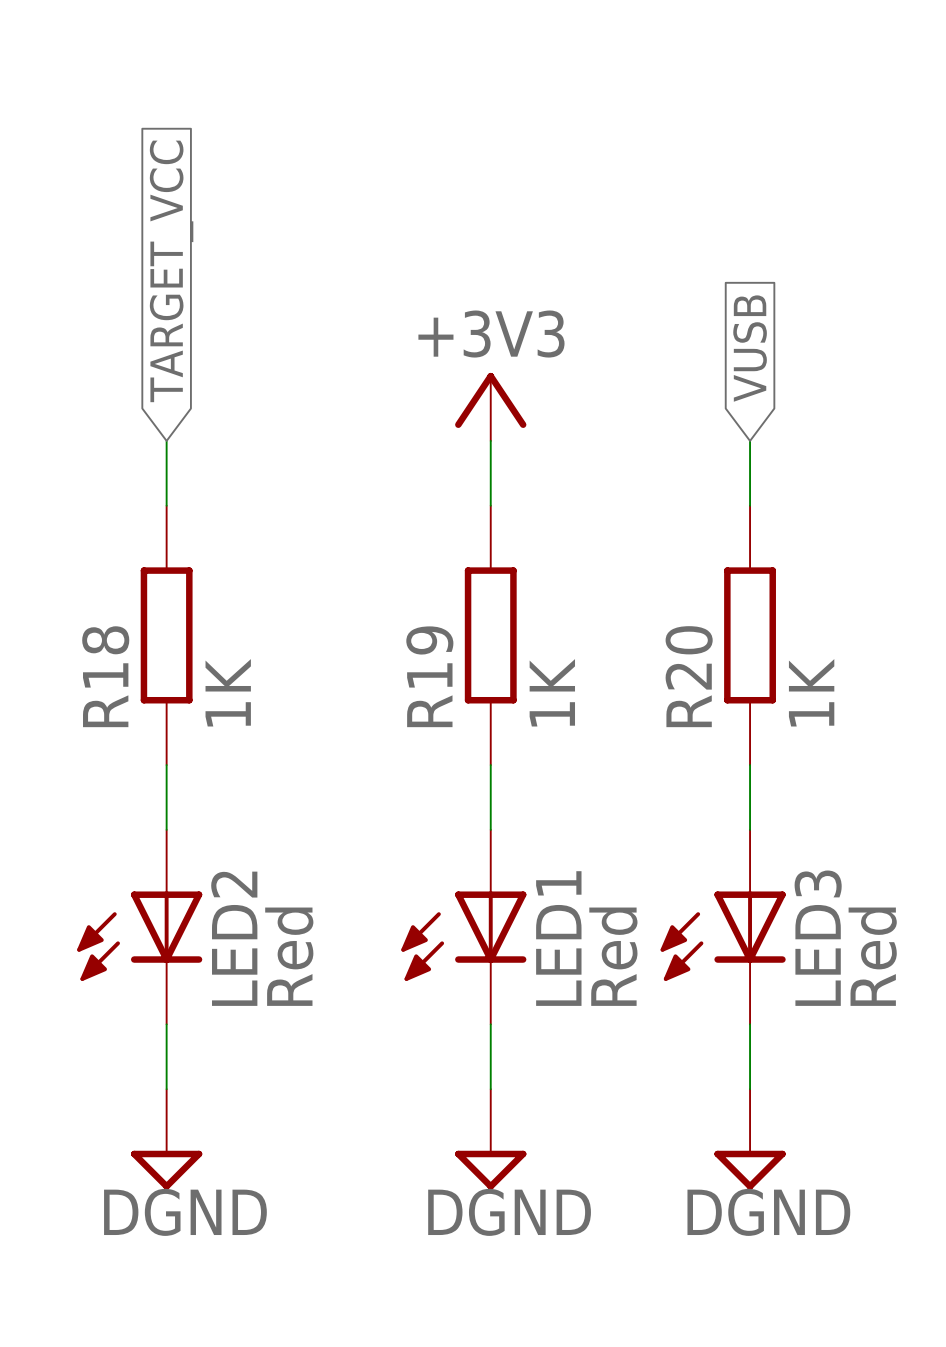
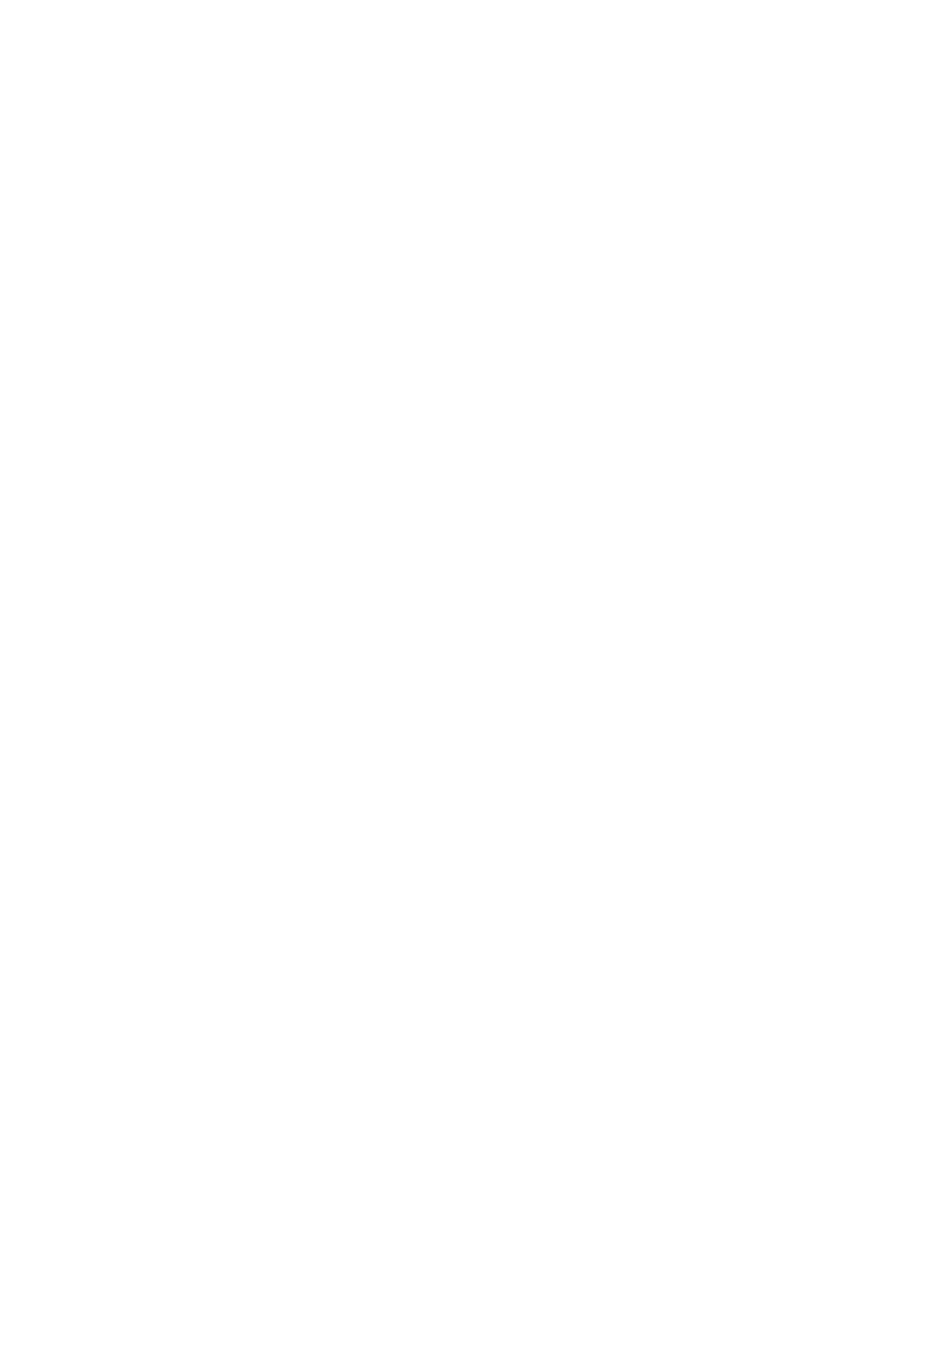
global label: TARGET_VCC (171, 271) -> none
global label: VUSB (750, 348) -> none
power symbol: +3V3 (490, 406) -> none
wire: (166, 440) (166, 505) -> none
wire: (490, 440) (490, 505) -> none
wire: (750, 440) (750, 505) -> none
R18: 1K (166, 635) -> none
R19: 1K (490, 635) -> none
R20: 1K (750, 635) -> none
wire: (166, 765) (166, 829) -> none
wire: (490, 765) (490, 829) -> none
wire: (750, 765) (750, 829) -> none
LED2: Red (139, 927) -> none
LED1: Red (463, 927) -> none
LED3: Red (723, 927) -> none
wire: (166, 1024) (166, 1089) -> none
wire: (490, 1024) (490, 1089) -> none
wire: (750, 1024) (750, 1089) -> none
power symbol: DGND (166, 1139) -> none
power symbol: DGND (490, 1139) -> none
power symbol: DGND (750, 1139) -> none

